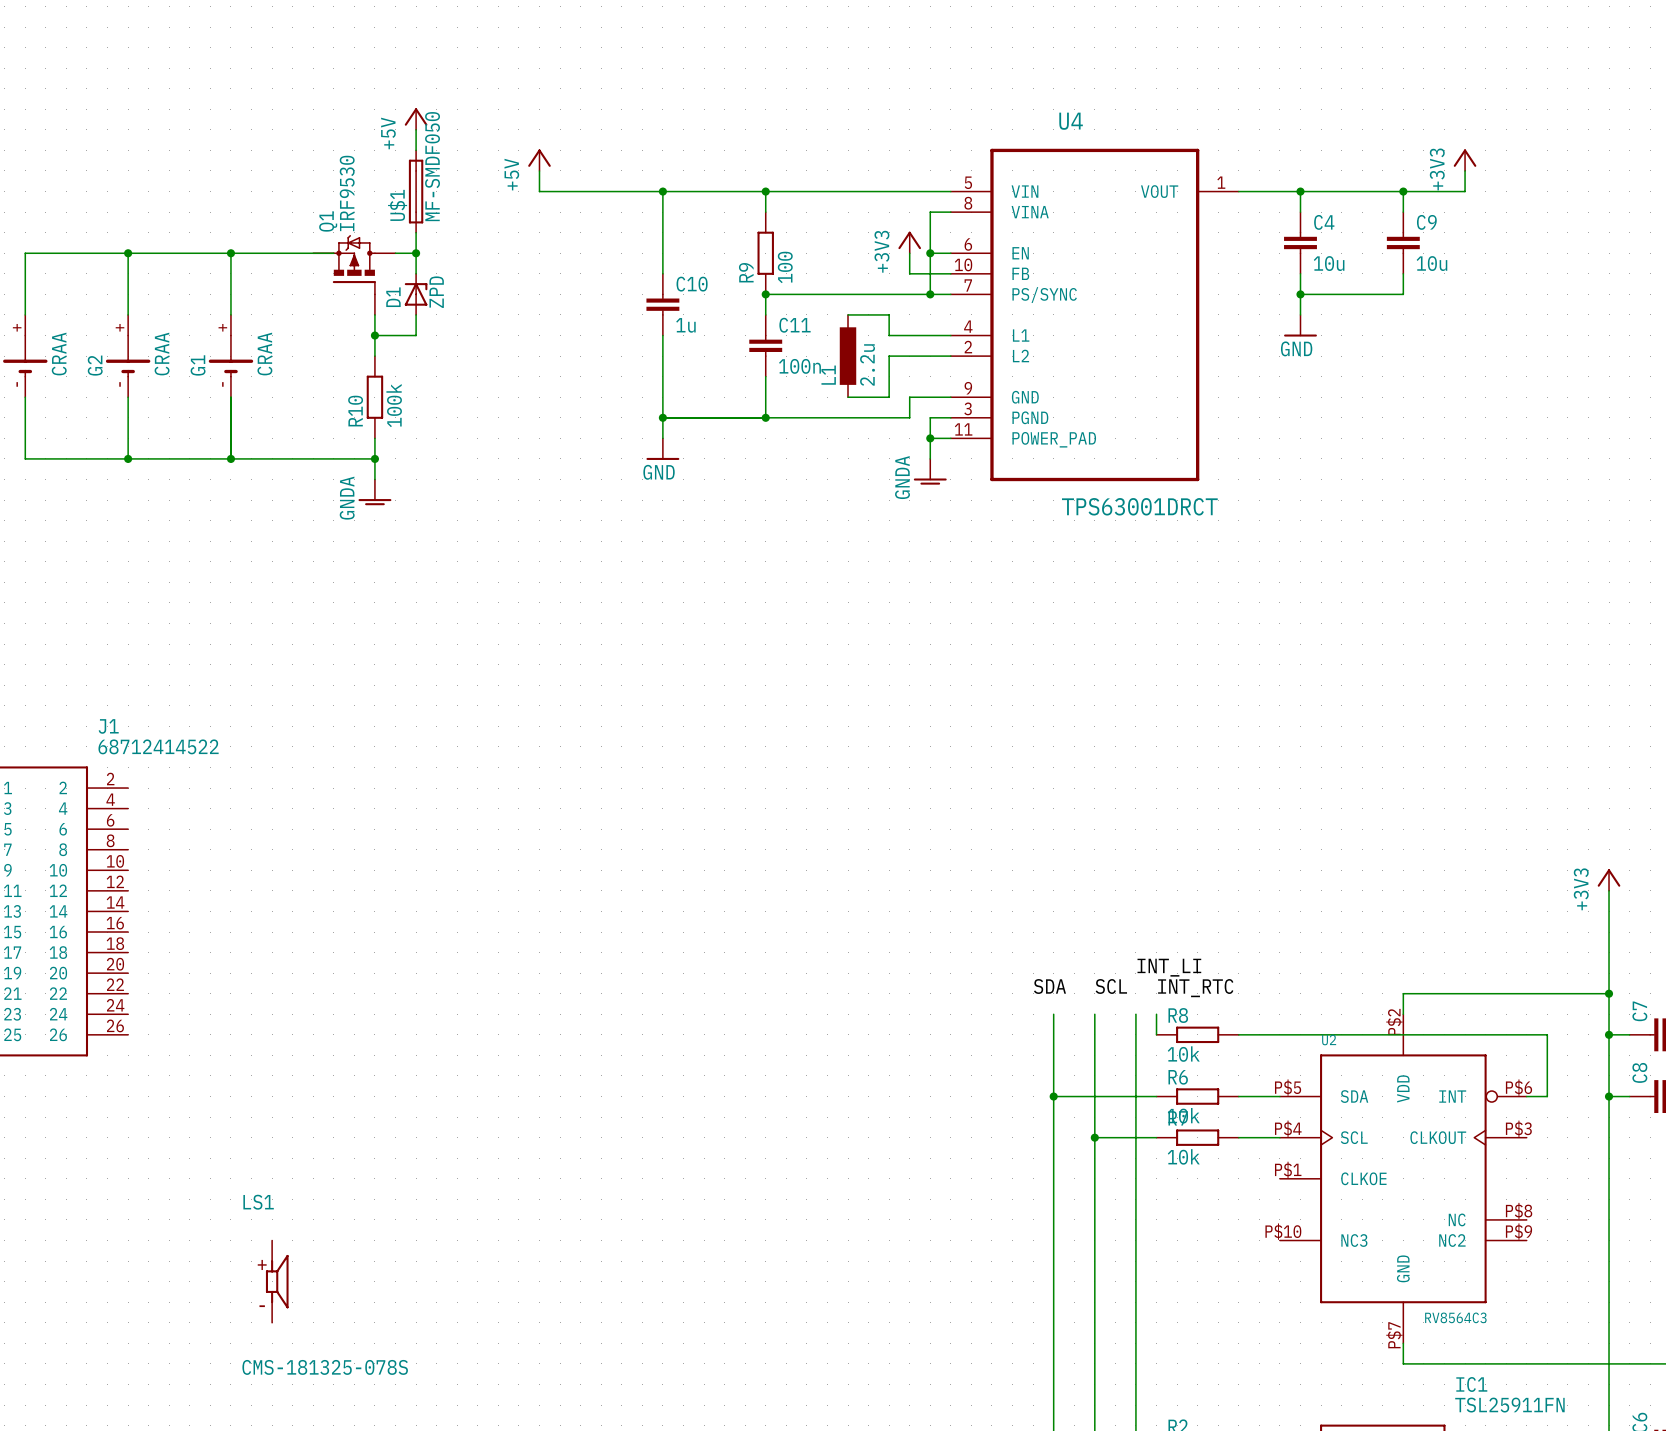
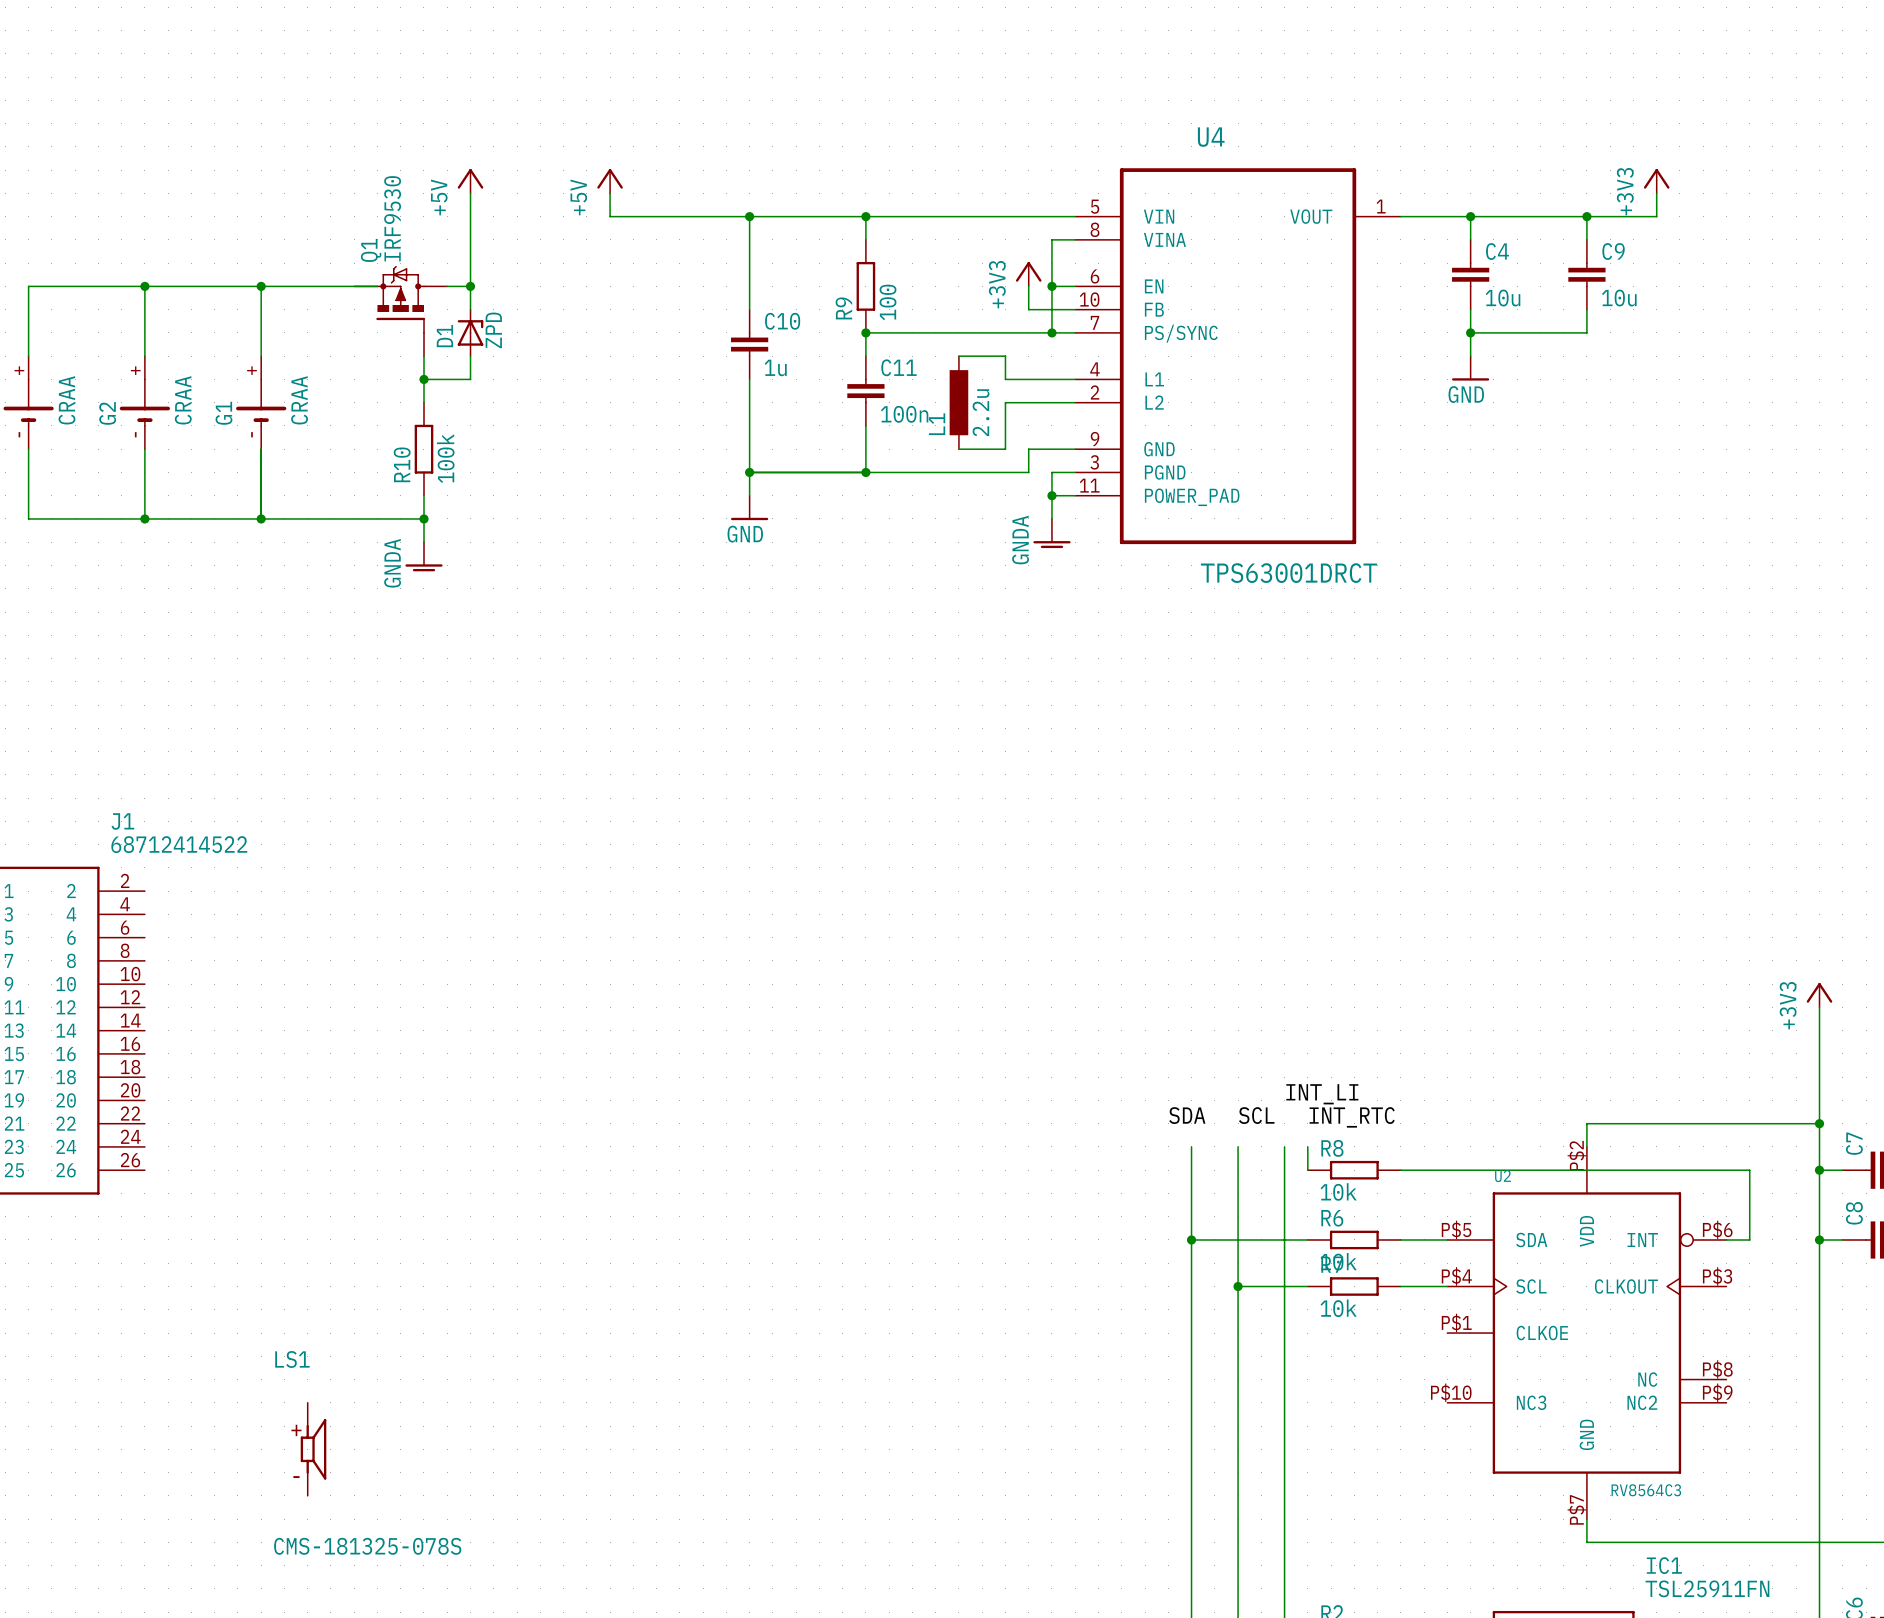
power symbol position: +5V (416, 119) -> +5V (470, 181)
wire: (416, 129) (416, 150) -> none
U$1: MF-SMDF050 (416, 191) -> none

